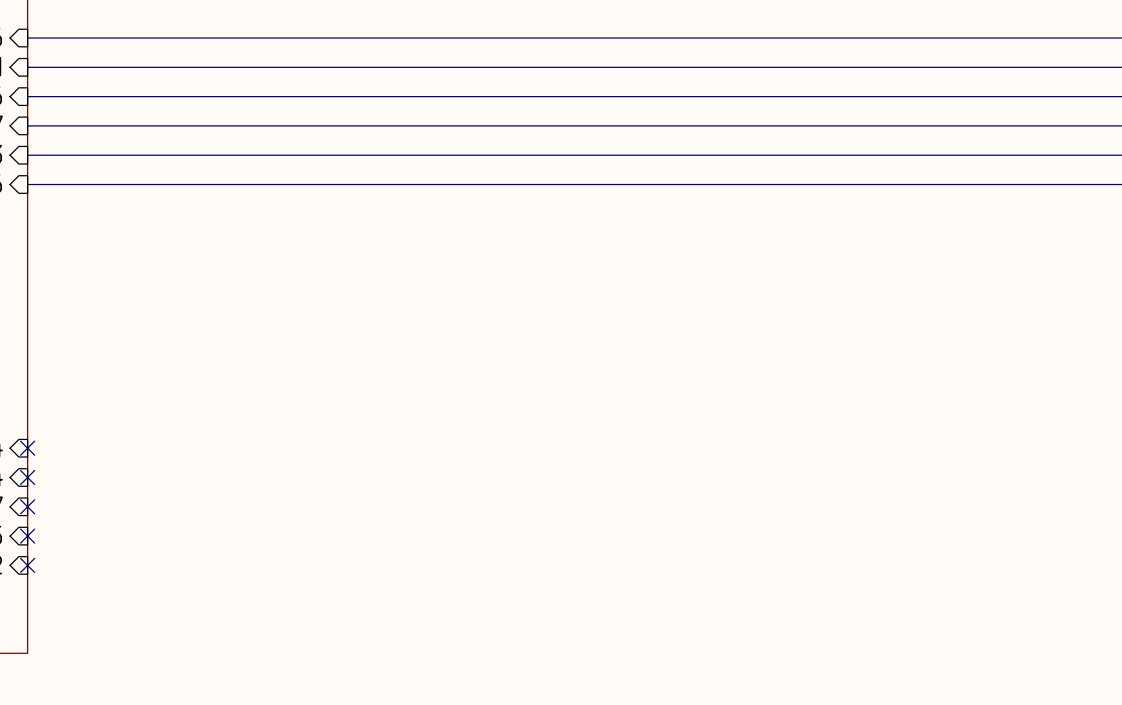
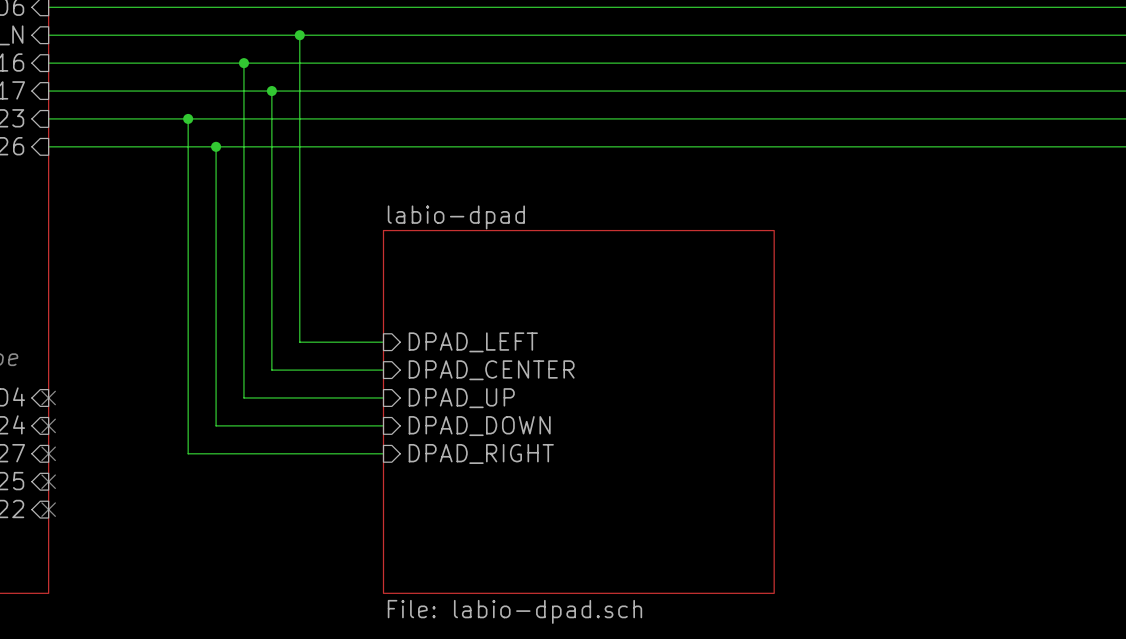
wire: none -> (299, 35) (299, 342) (383, 342)
junction: none -> (299, 35)
wire: none -> (243, 63) (243, 397) (383, 397)
junction: none -> (243, 63)
wire: none -> (271, 91) (271, 370) (383, 370)
junction: none -> (271, 91)
wire: none -> (188, 118) (188, 453) (383, 453)
junction: none -> (188, 118)
wire: none -> (216, 146) (216, 425) (383, 425)
junction: none -> (216, 146)
sheet pin: none -> DPAD_LEFT (473, 342)
sheet pin: none -> DPAD_CENTER (491, 370)
sheet pin: none -> DPAD_UP (461, 398)
sheet labio-dpad: none -> File: labio-dpad.sch (578, 411)
sheet pin: none -> DPAD_DOWN (479, 426)
sheet pin: none -> DPAD_RIGHT (481, 453)

